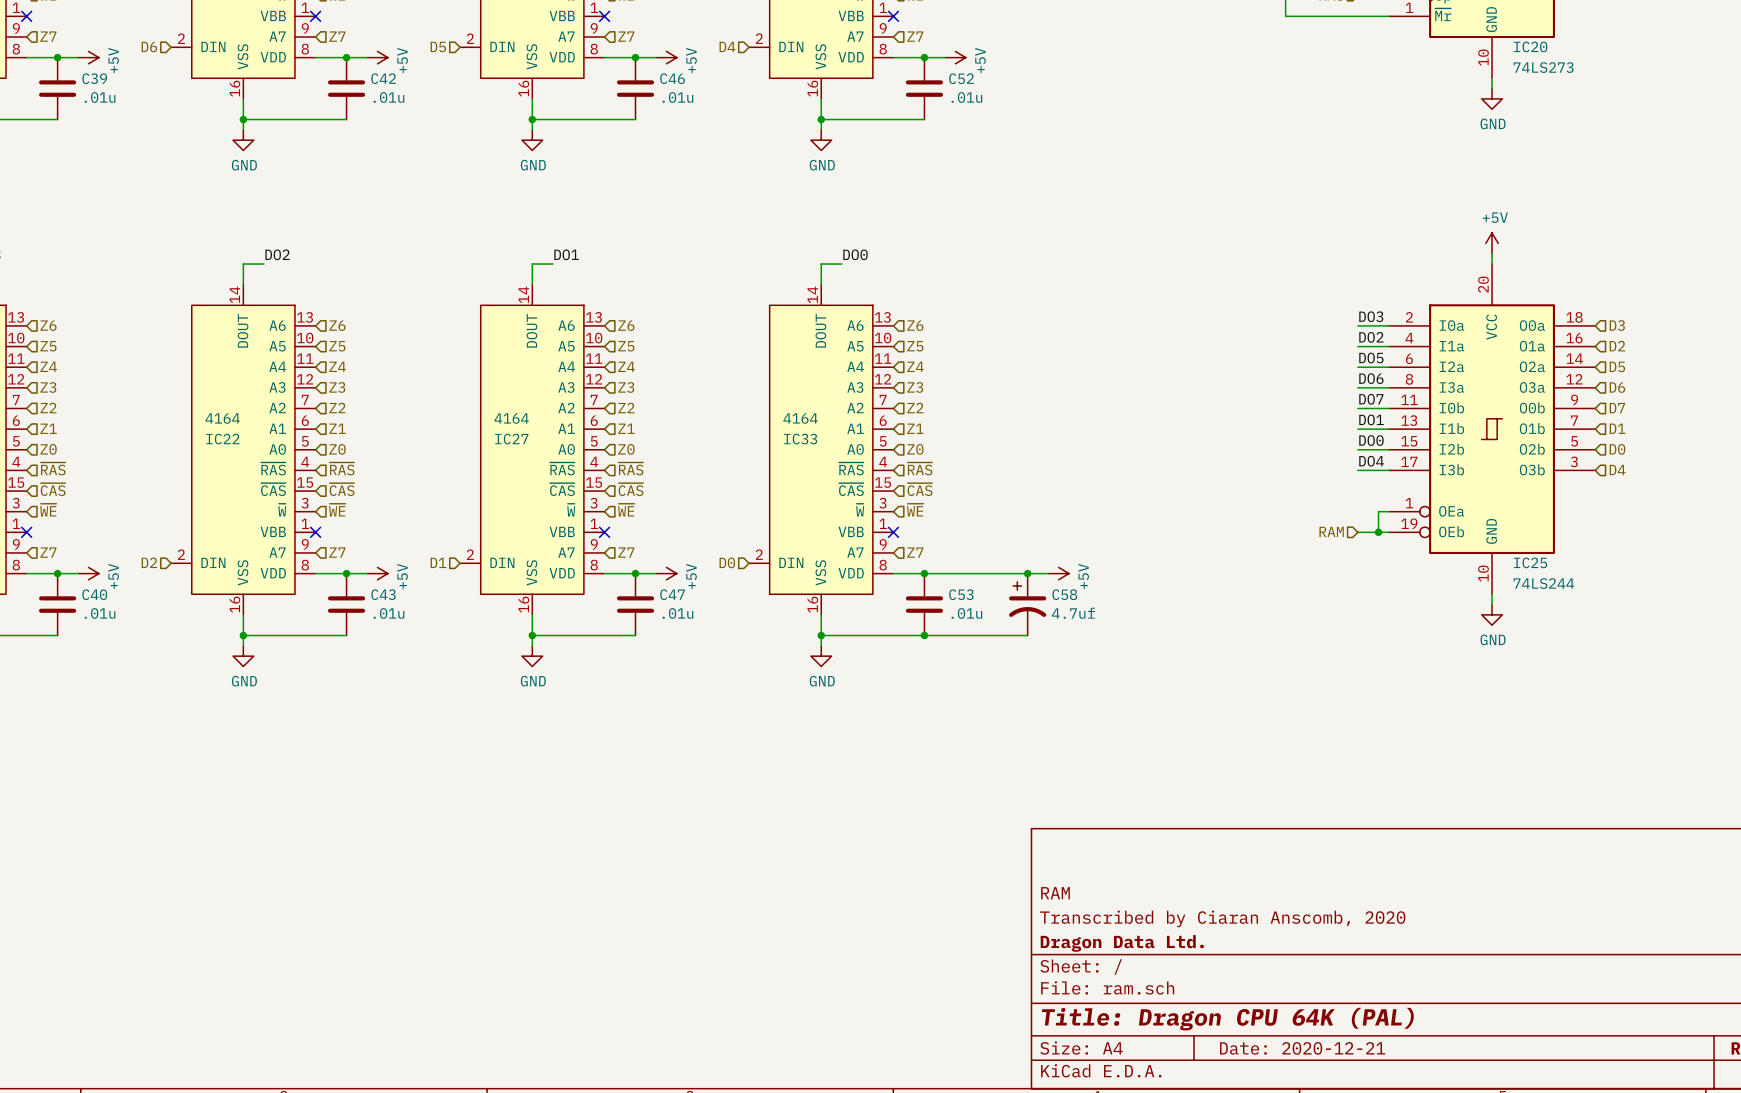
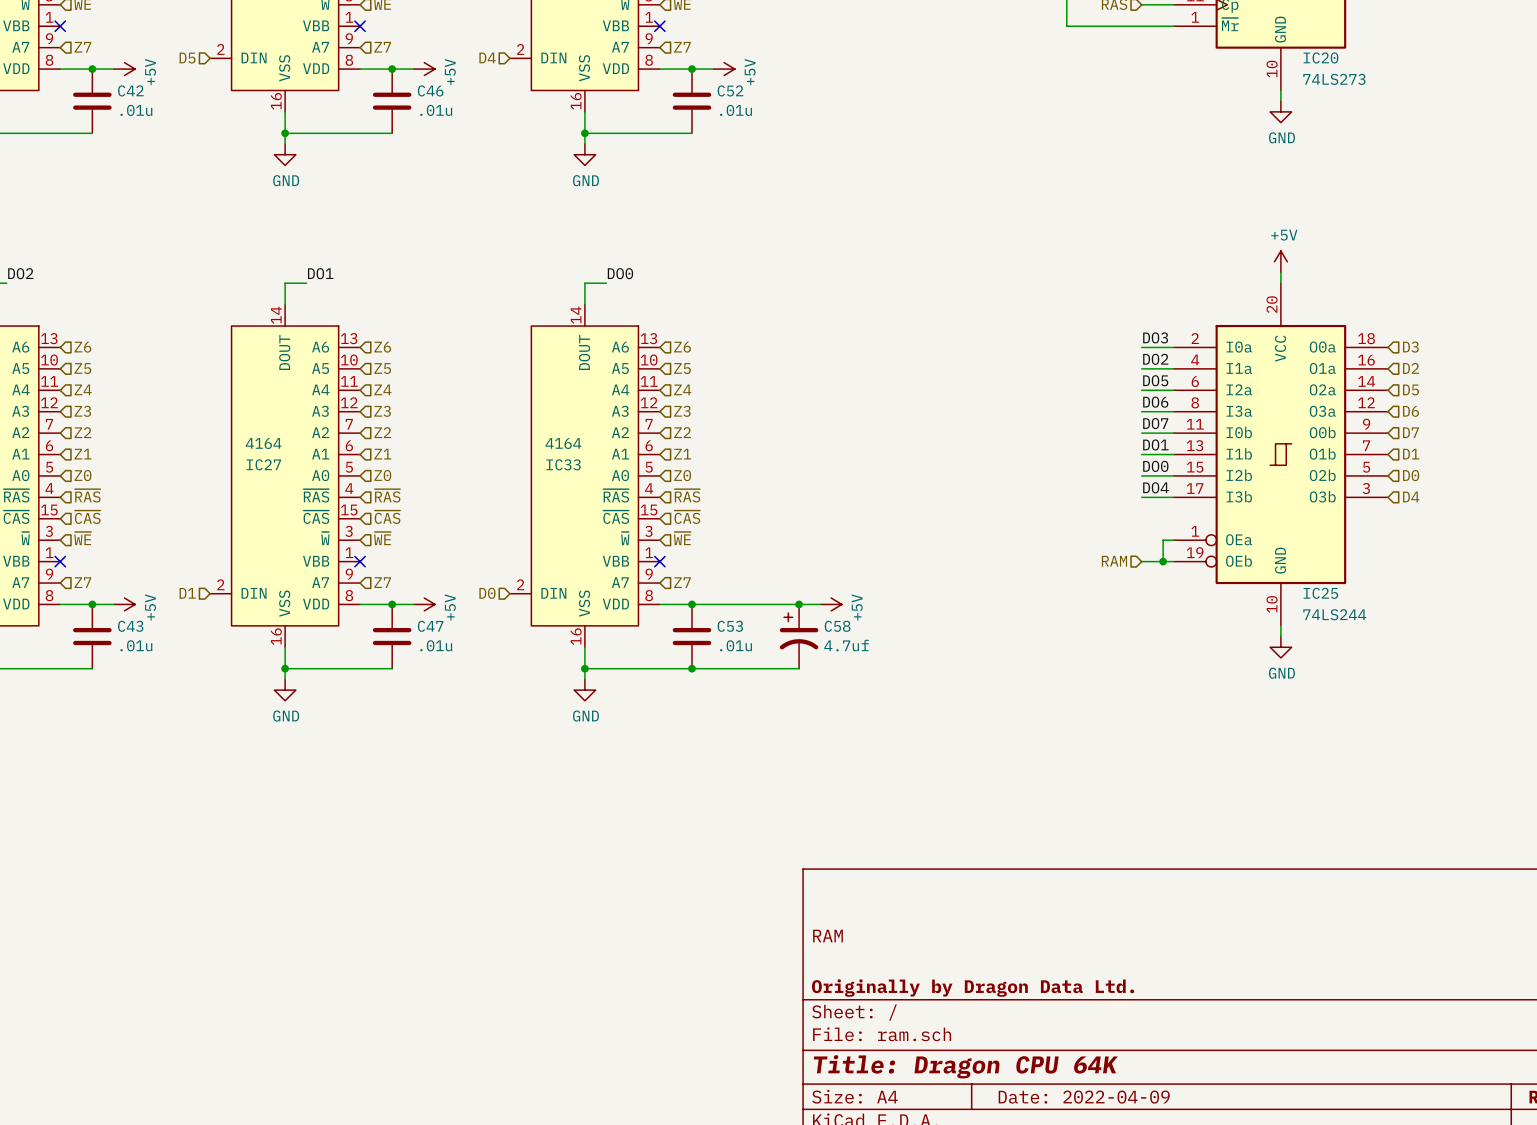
title block: Transcribed by Ciaran Anscomb, 2020 (1222, 918) -> none
title block: Dragon Data Ltd. (1122, 943) -> Originally by Dragon Data Ltd. (973, 988)
title block: Title: Dragon CPU 64K (PAL) (1227, 1019) -> Title: Dragon CPU 64K (965, 1066)
title block: Date: 2020-12-21 (1302, 1048) -> Date: 2022-04-09 (1084, 1097)

